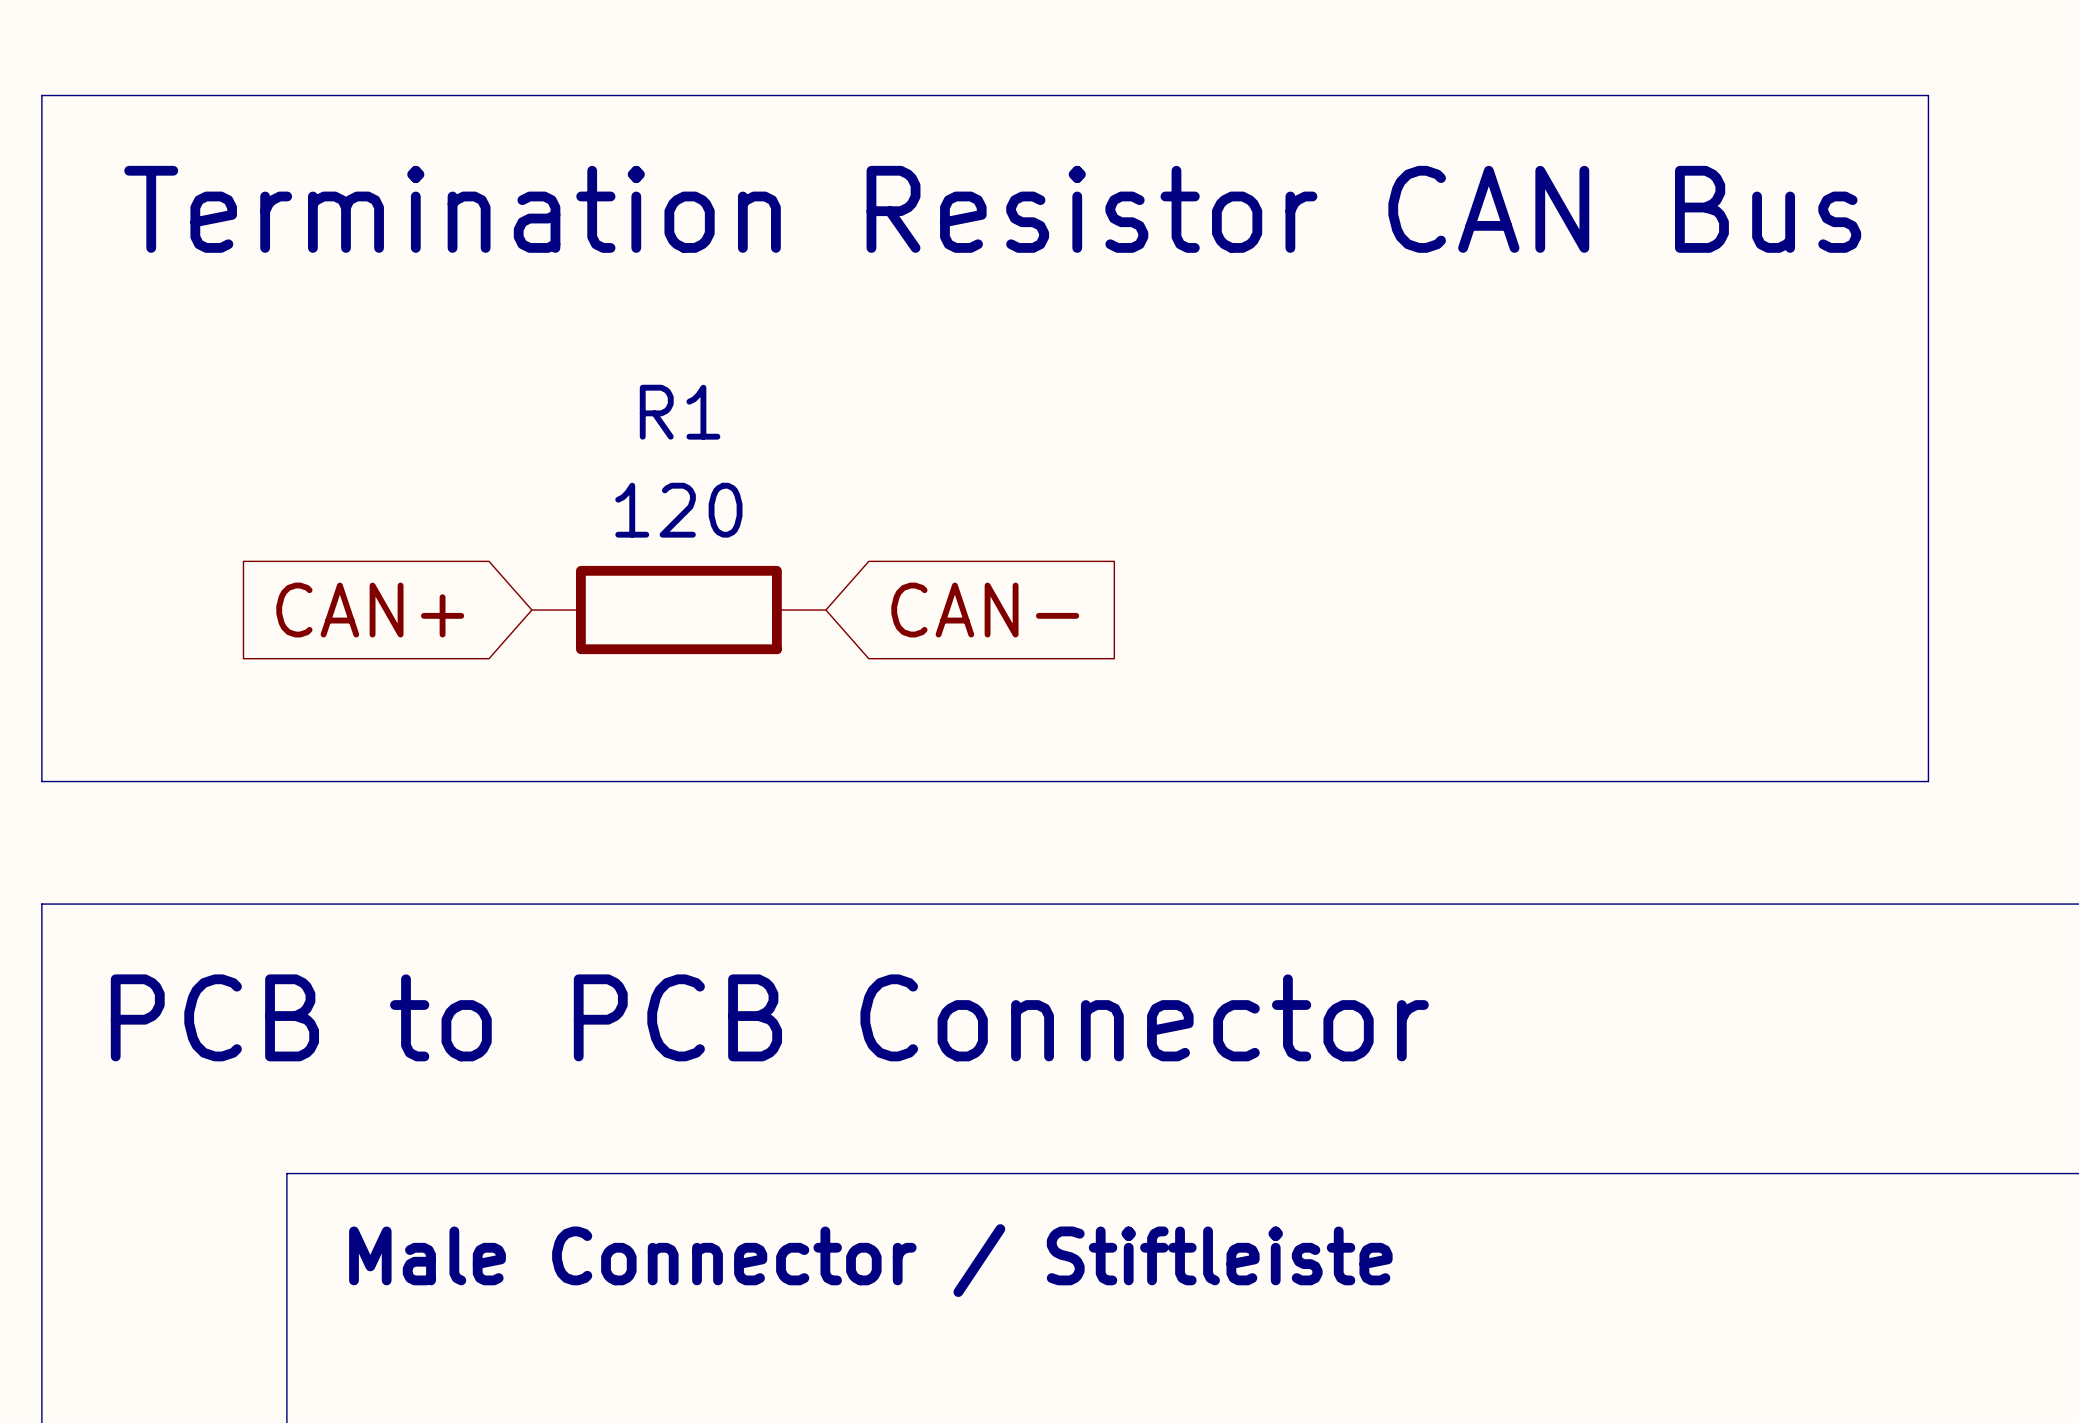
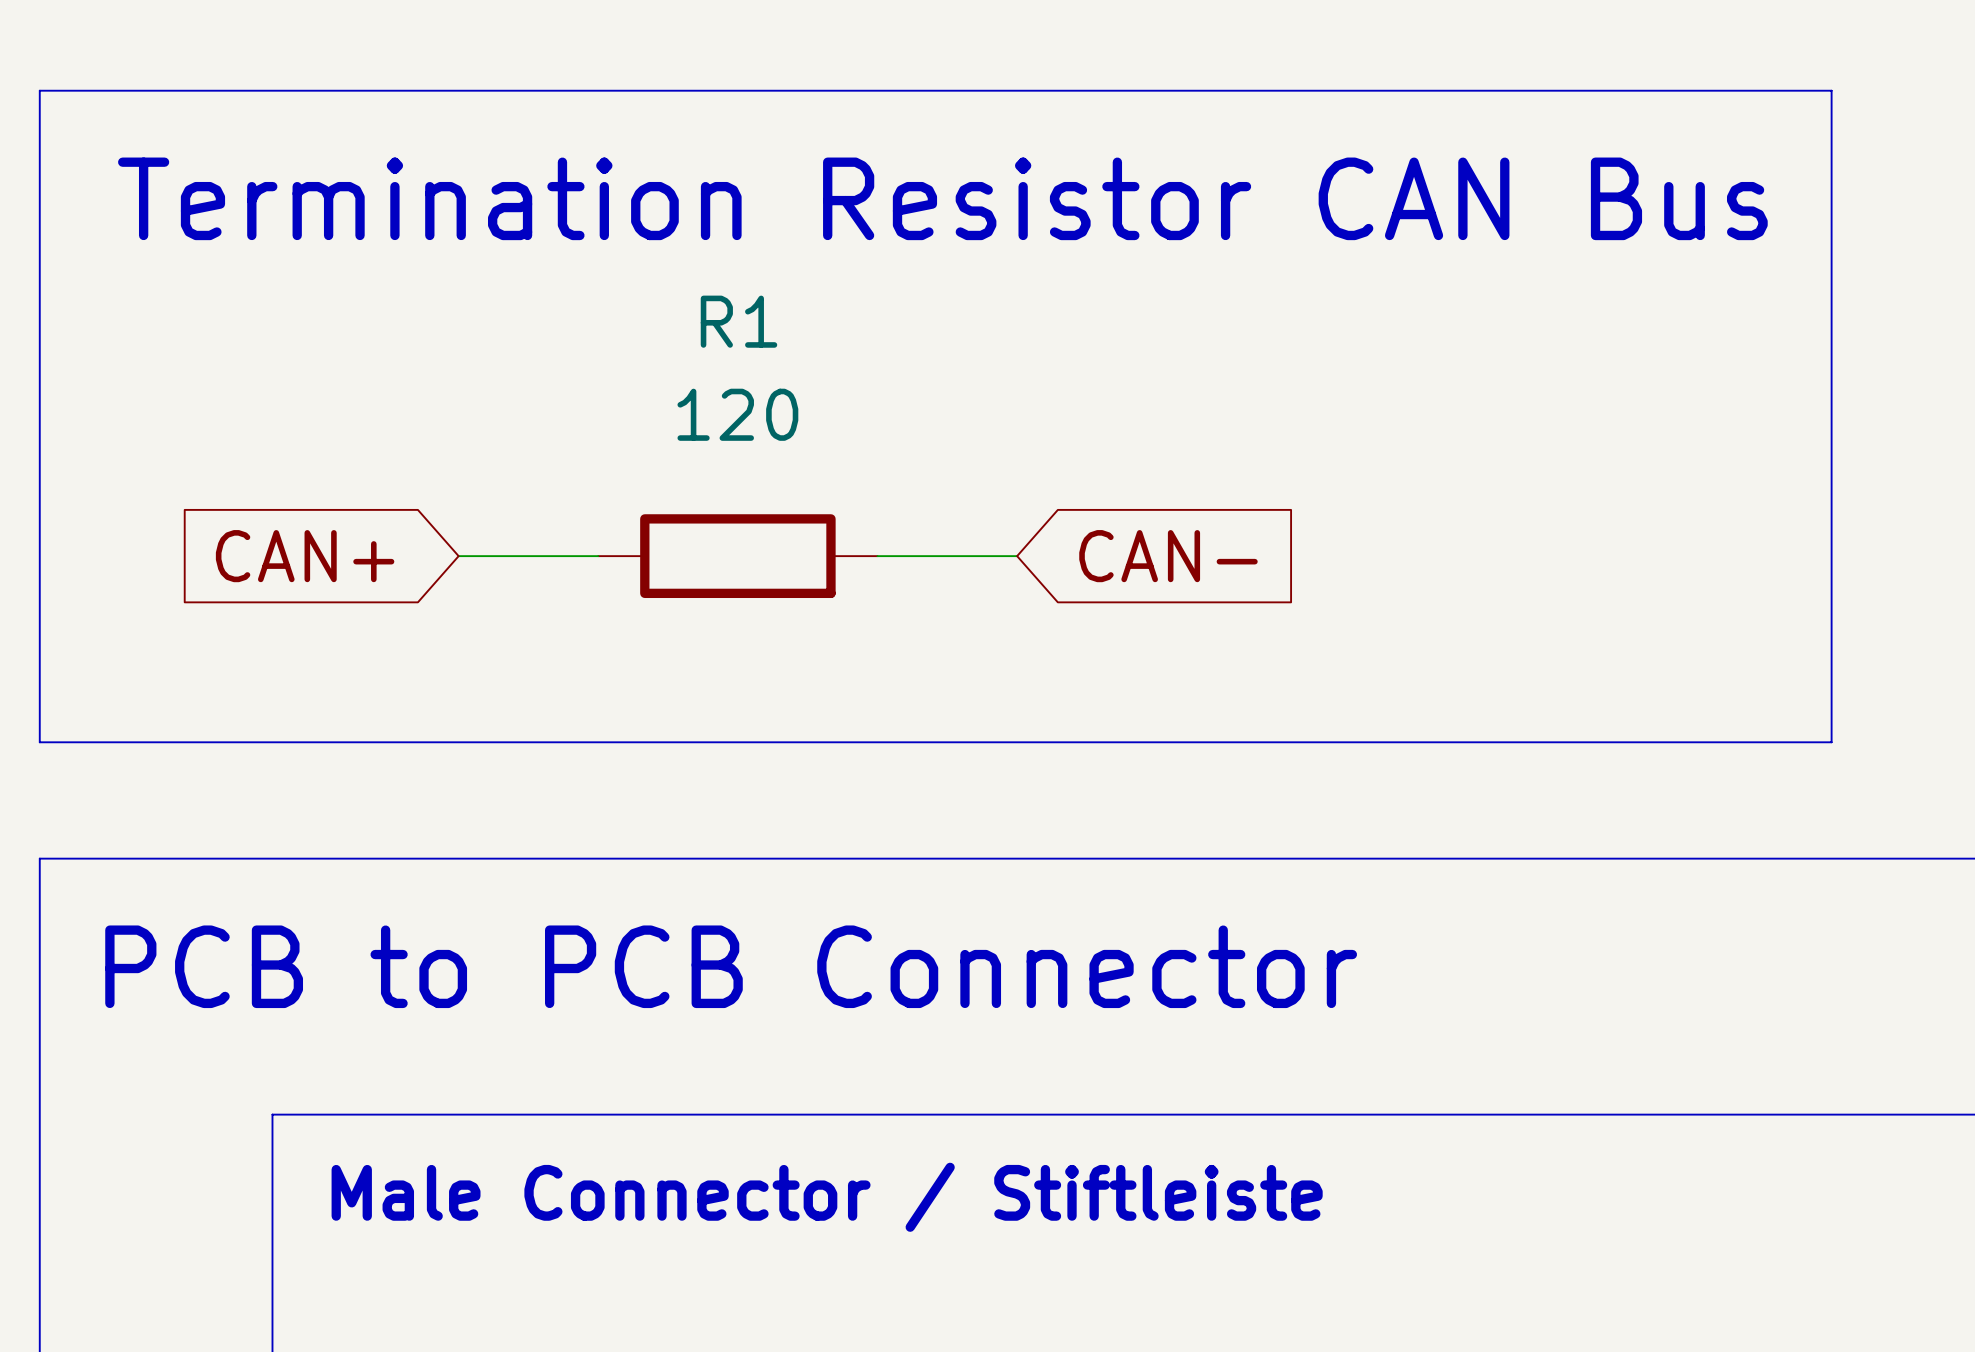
R1 name position: R1 (680, 412) -> R1 (739, 321)
R1 value position: 120 (678, 510) -> 120 (737, 414)
wire: none -> (458, 556) (598, 556)
wire: none -> (877, 556) (1017, 556)
global label position: CAN+ (370, 610) -> CAN+ (305, 556)
R1 position: (678, 610) -> (737, 556)
global label position: CAN- (985, 610) -> CAN- (1168, 556)

